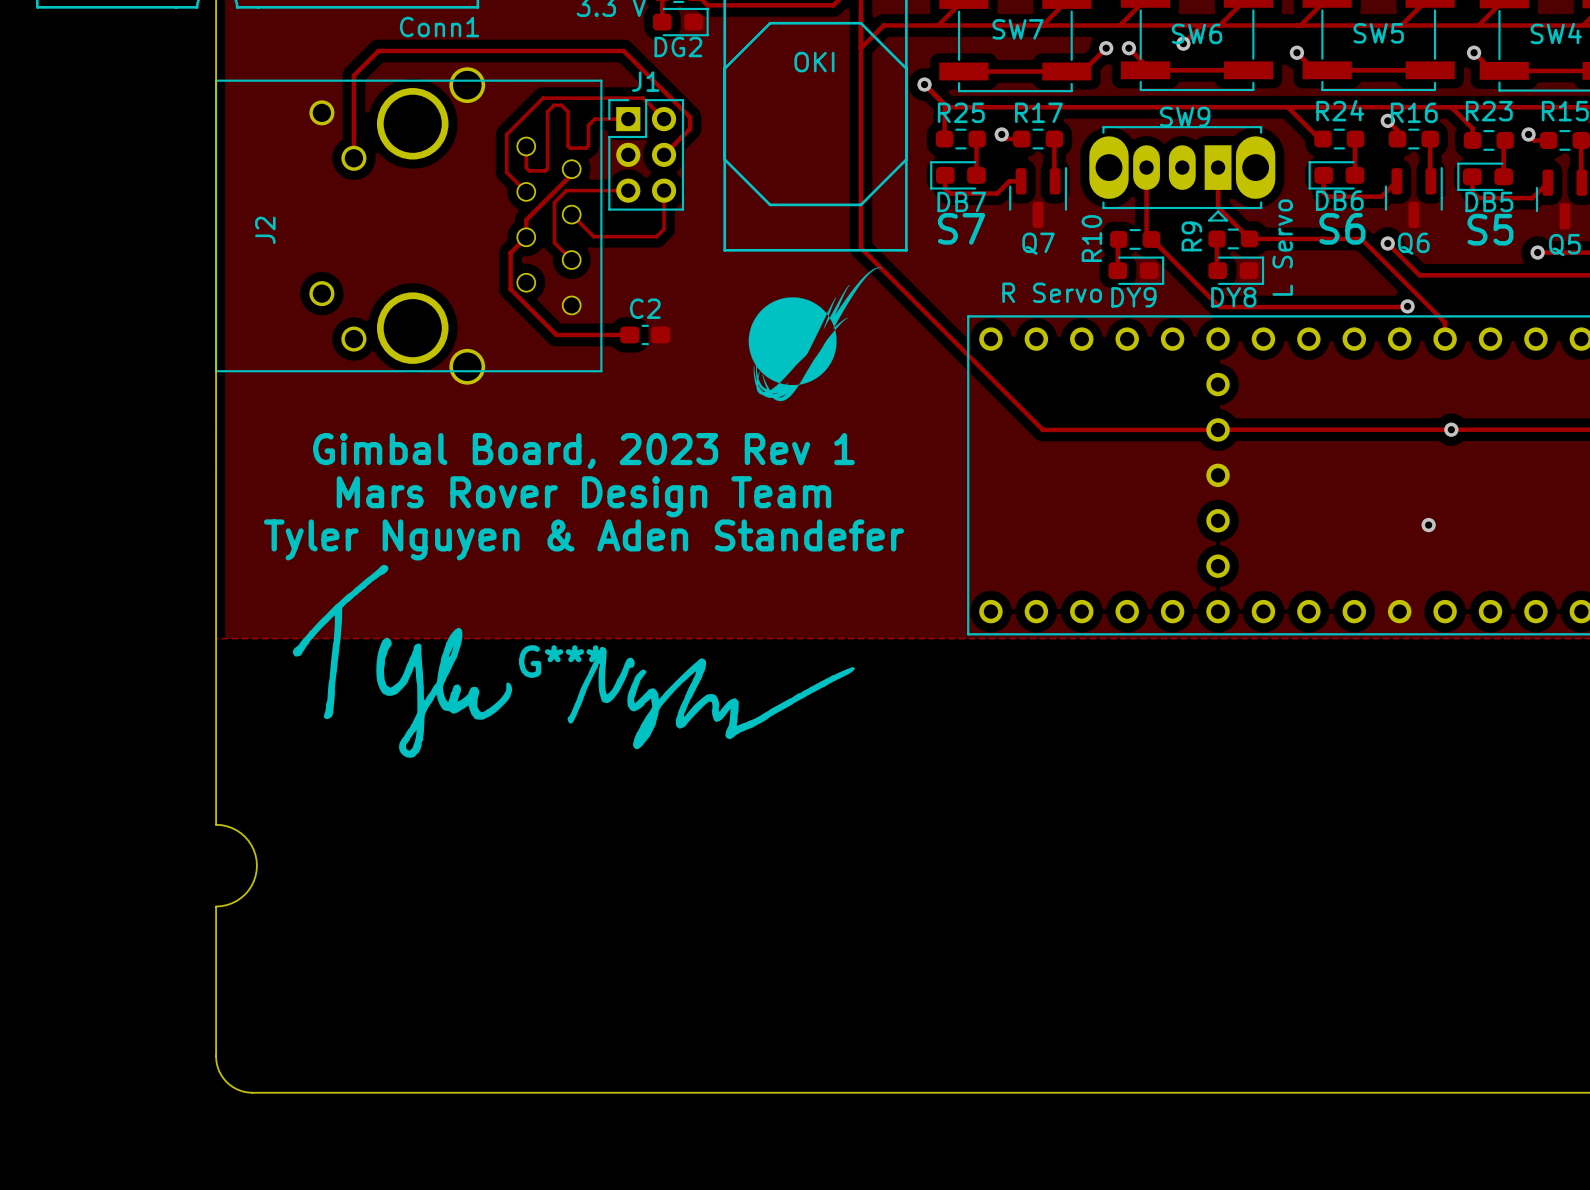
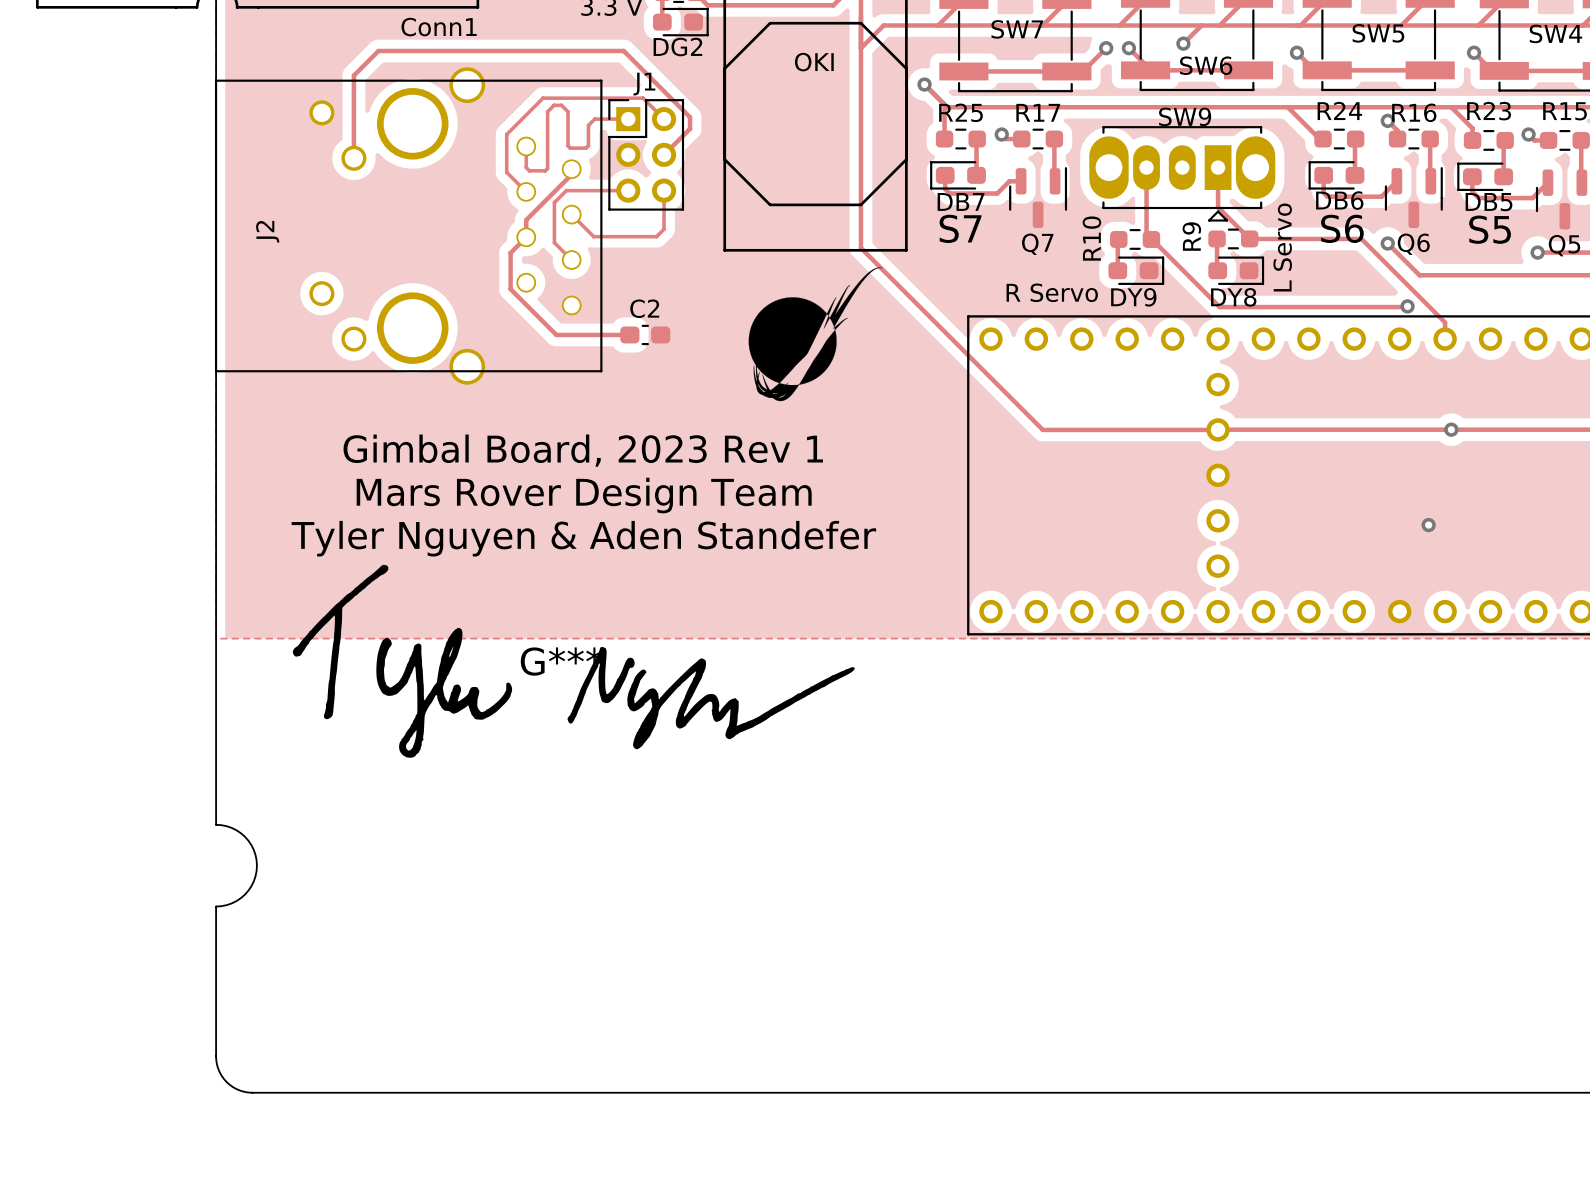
SW6 name position: SW6 (1197, 33) -> SW6 (1206, 65)

